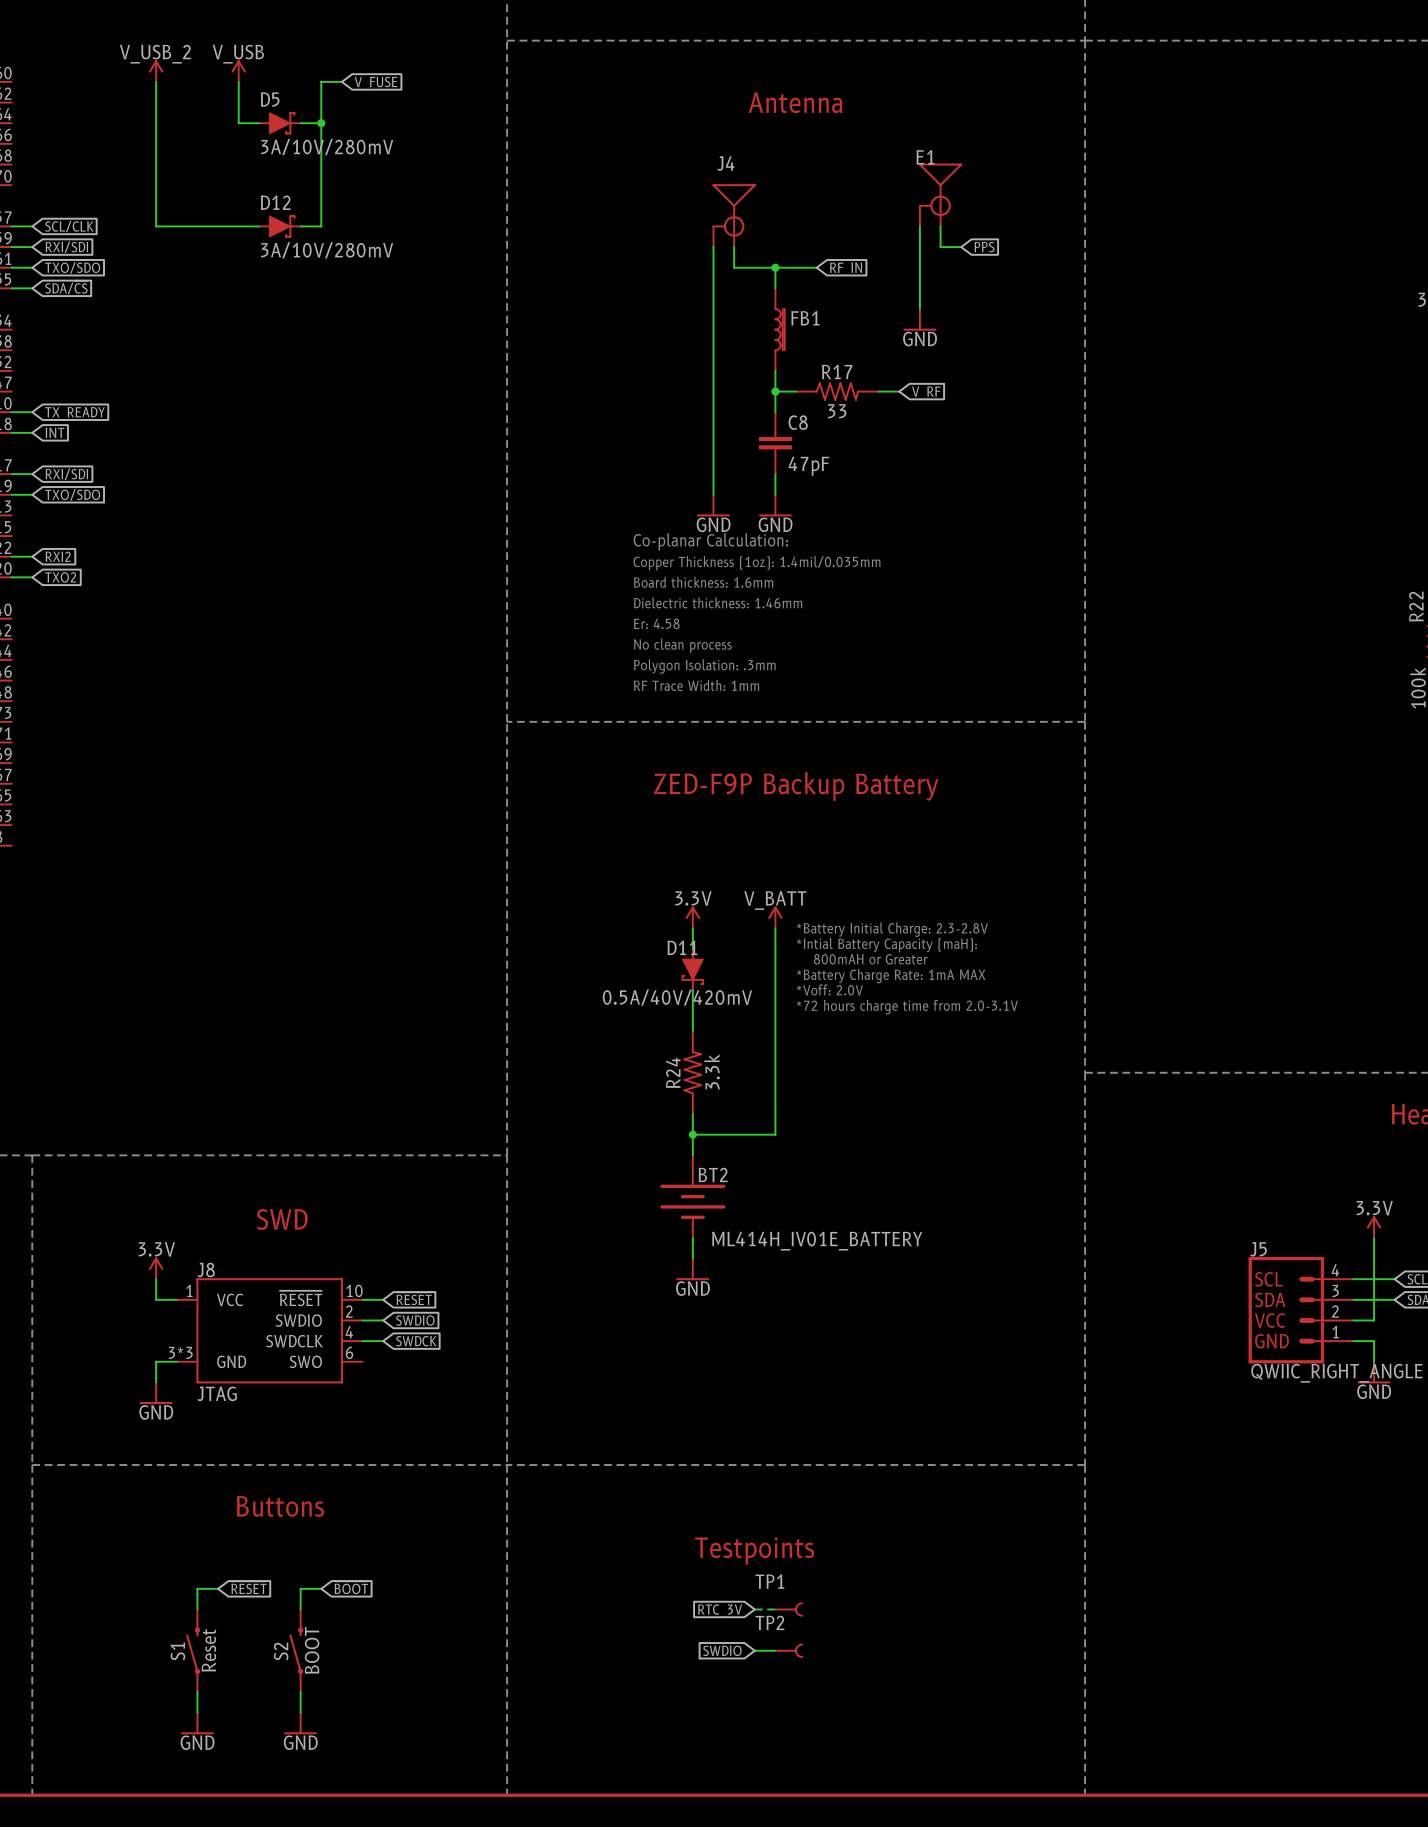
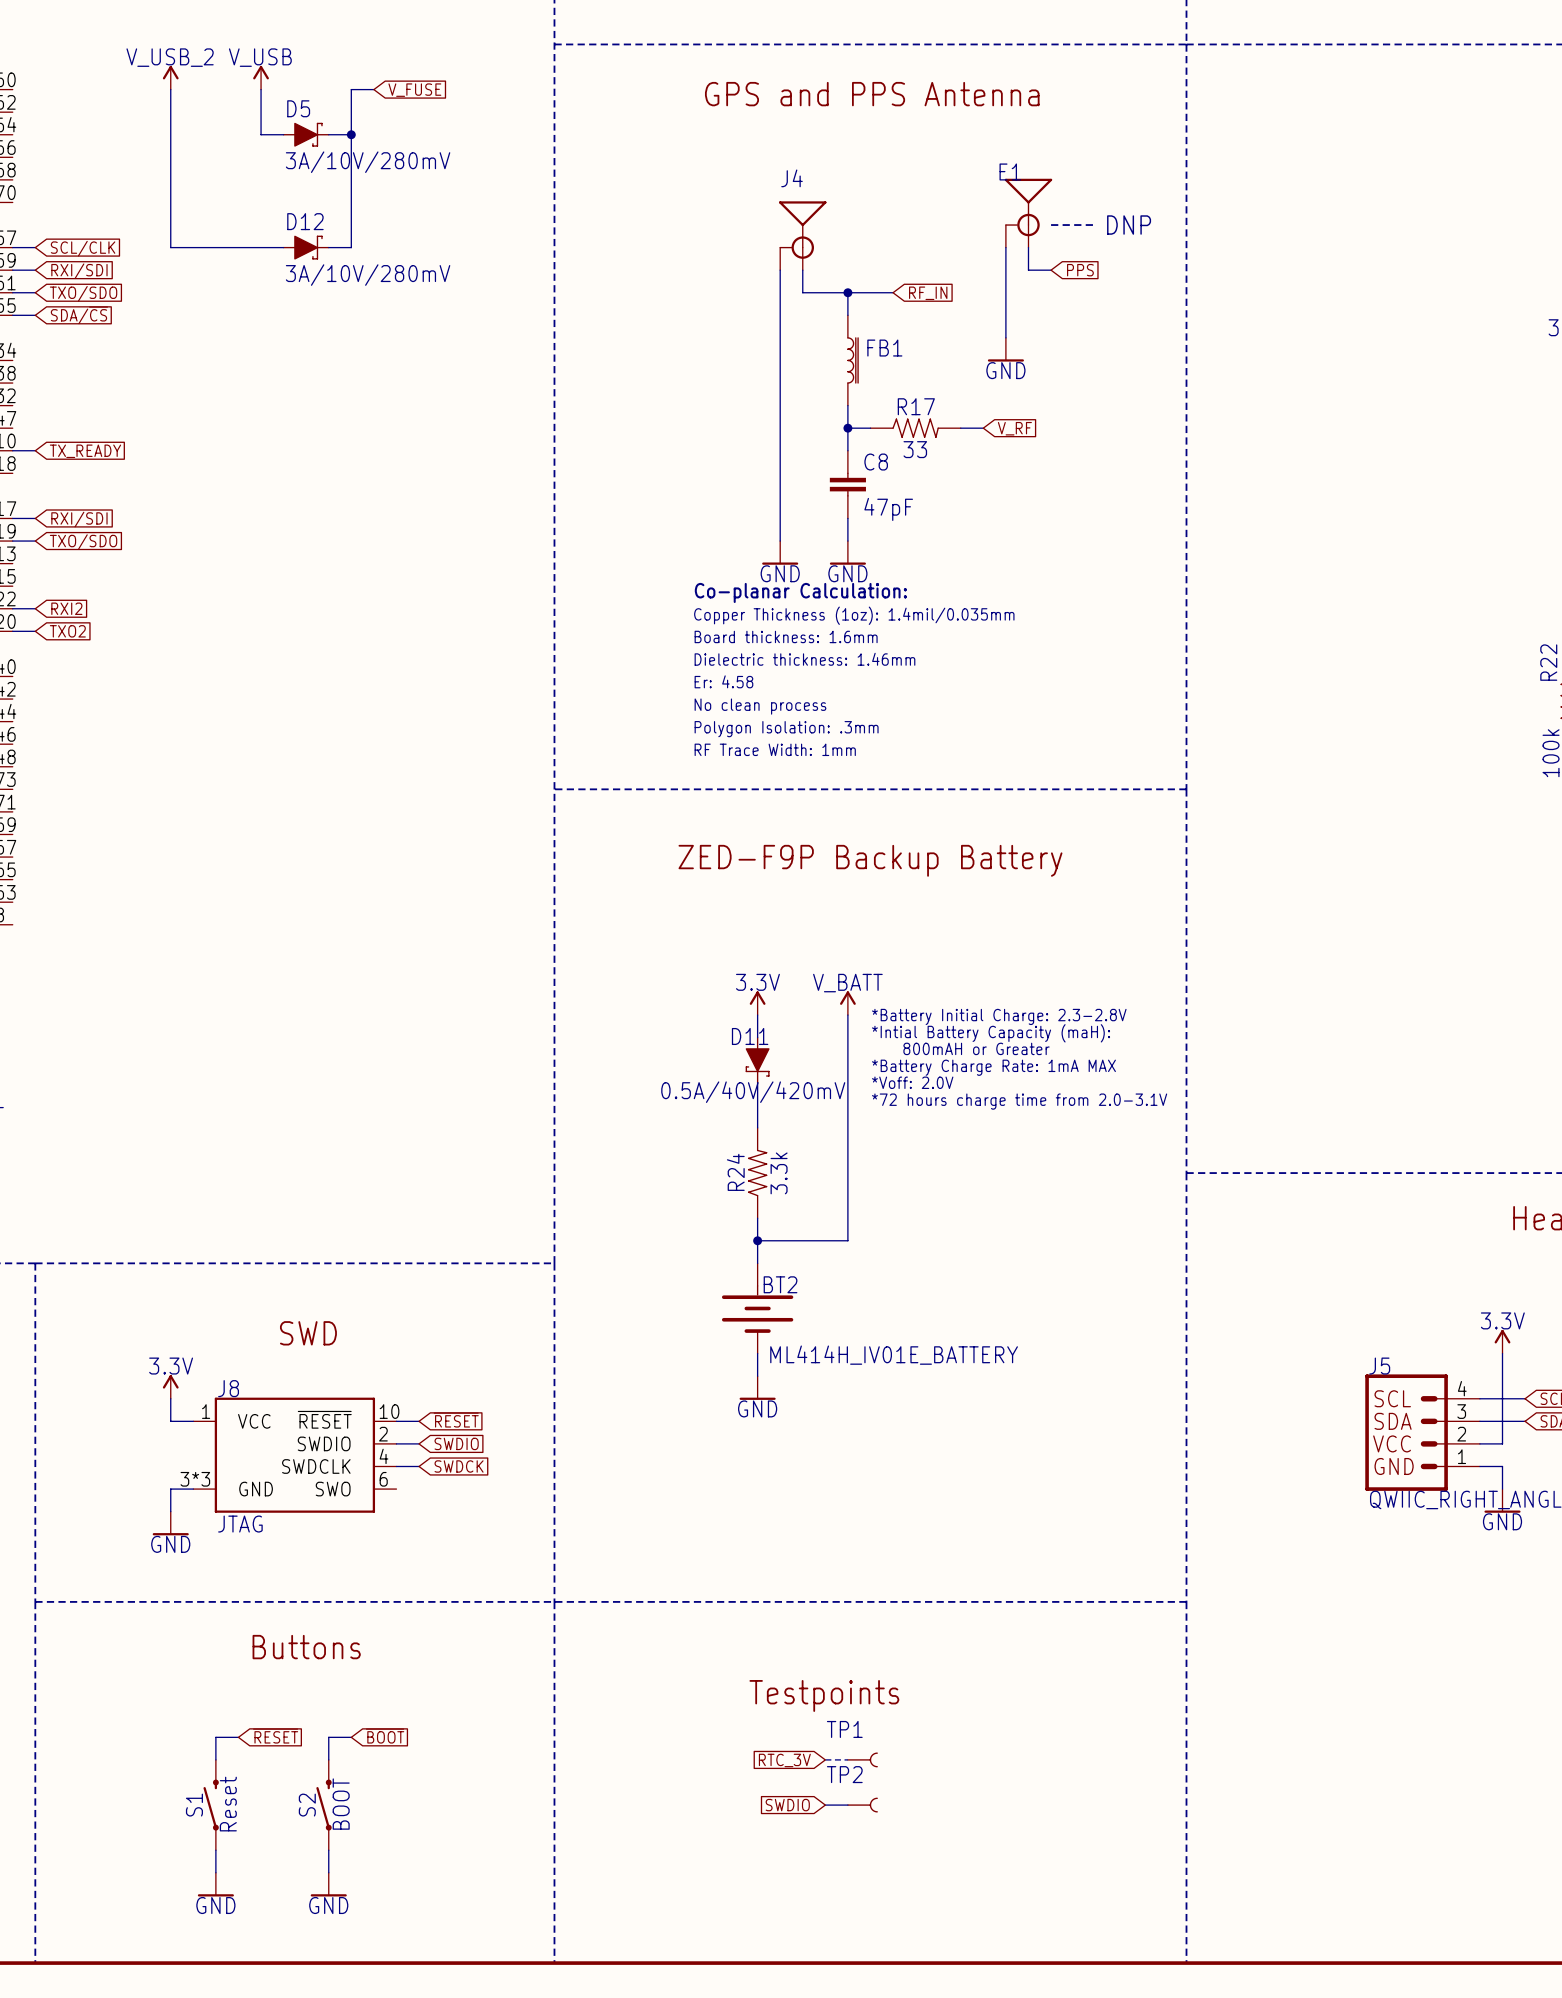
text: none -> GPS and PPS Antenna (872, 94)
text: Antenna (795, 102) -> none
line: none -> (1051, 225) (1096, 225)
text: none -> DNP (1129, 225)
wire: (11, 432) (32, 432) -> none
global label: INT (54, 432) -> none

